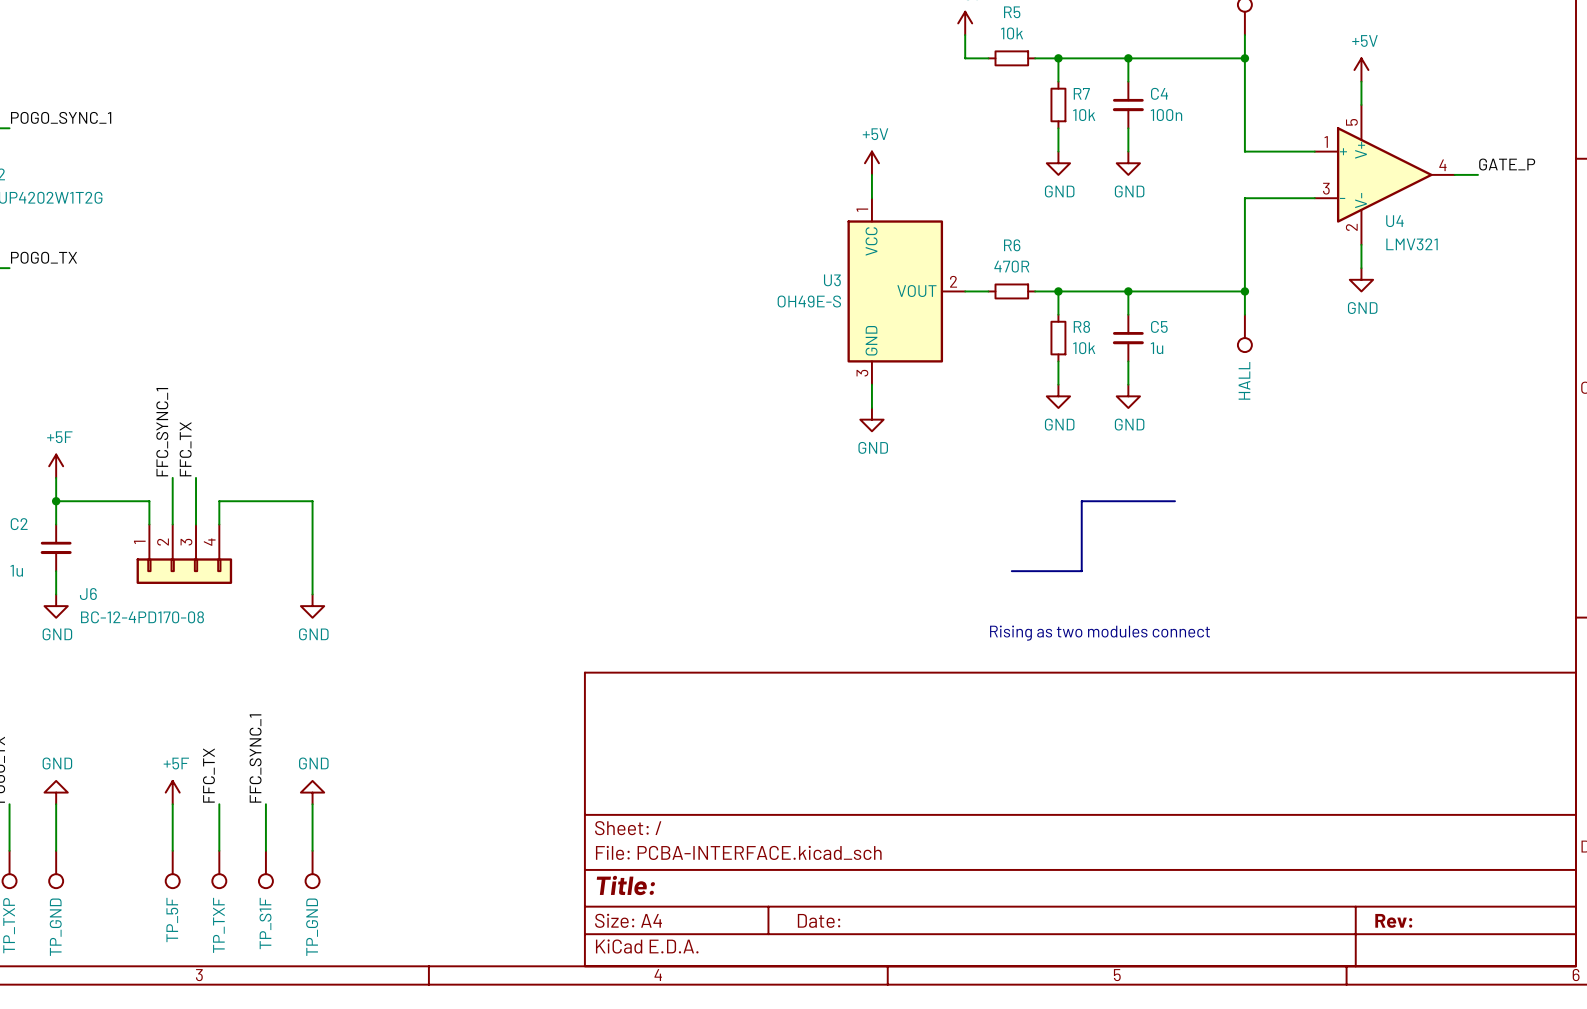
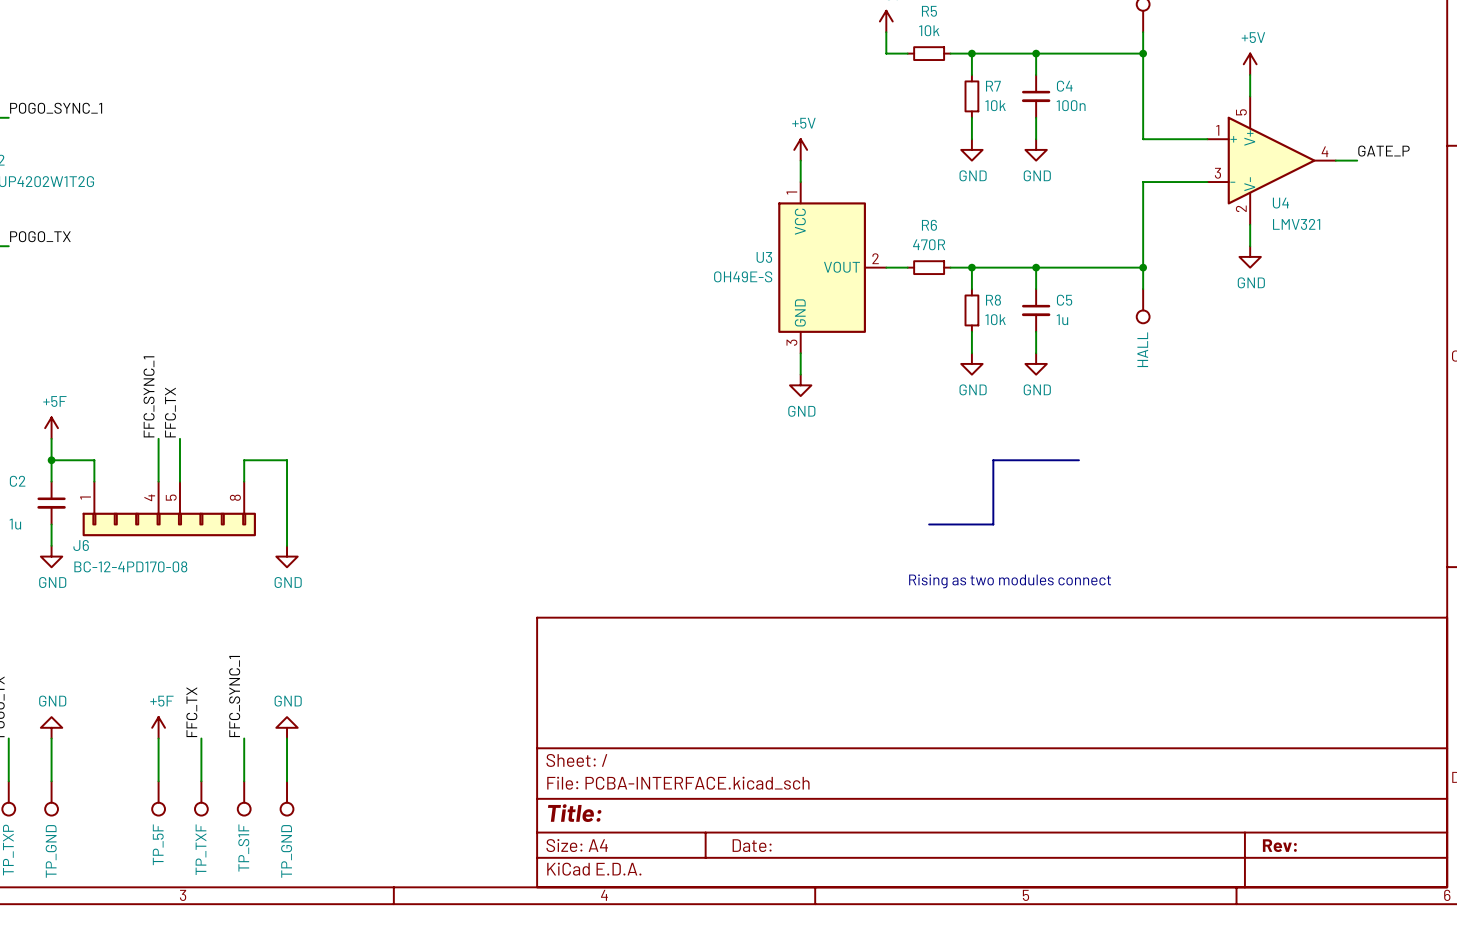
wire: (102, 501) (149, 501) (149, 524) -> (94, 460) (94, 481)
wire: (265, 501) (219, 501) (219, 524) -> (244, 460) (244, 481)
J6 symbol: [136, 524, 233, 584] -> [82, 481, 256, 537]

